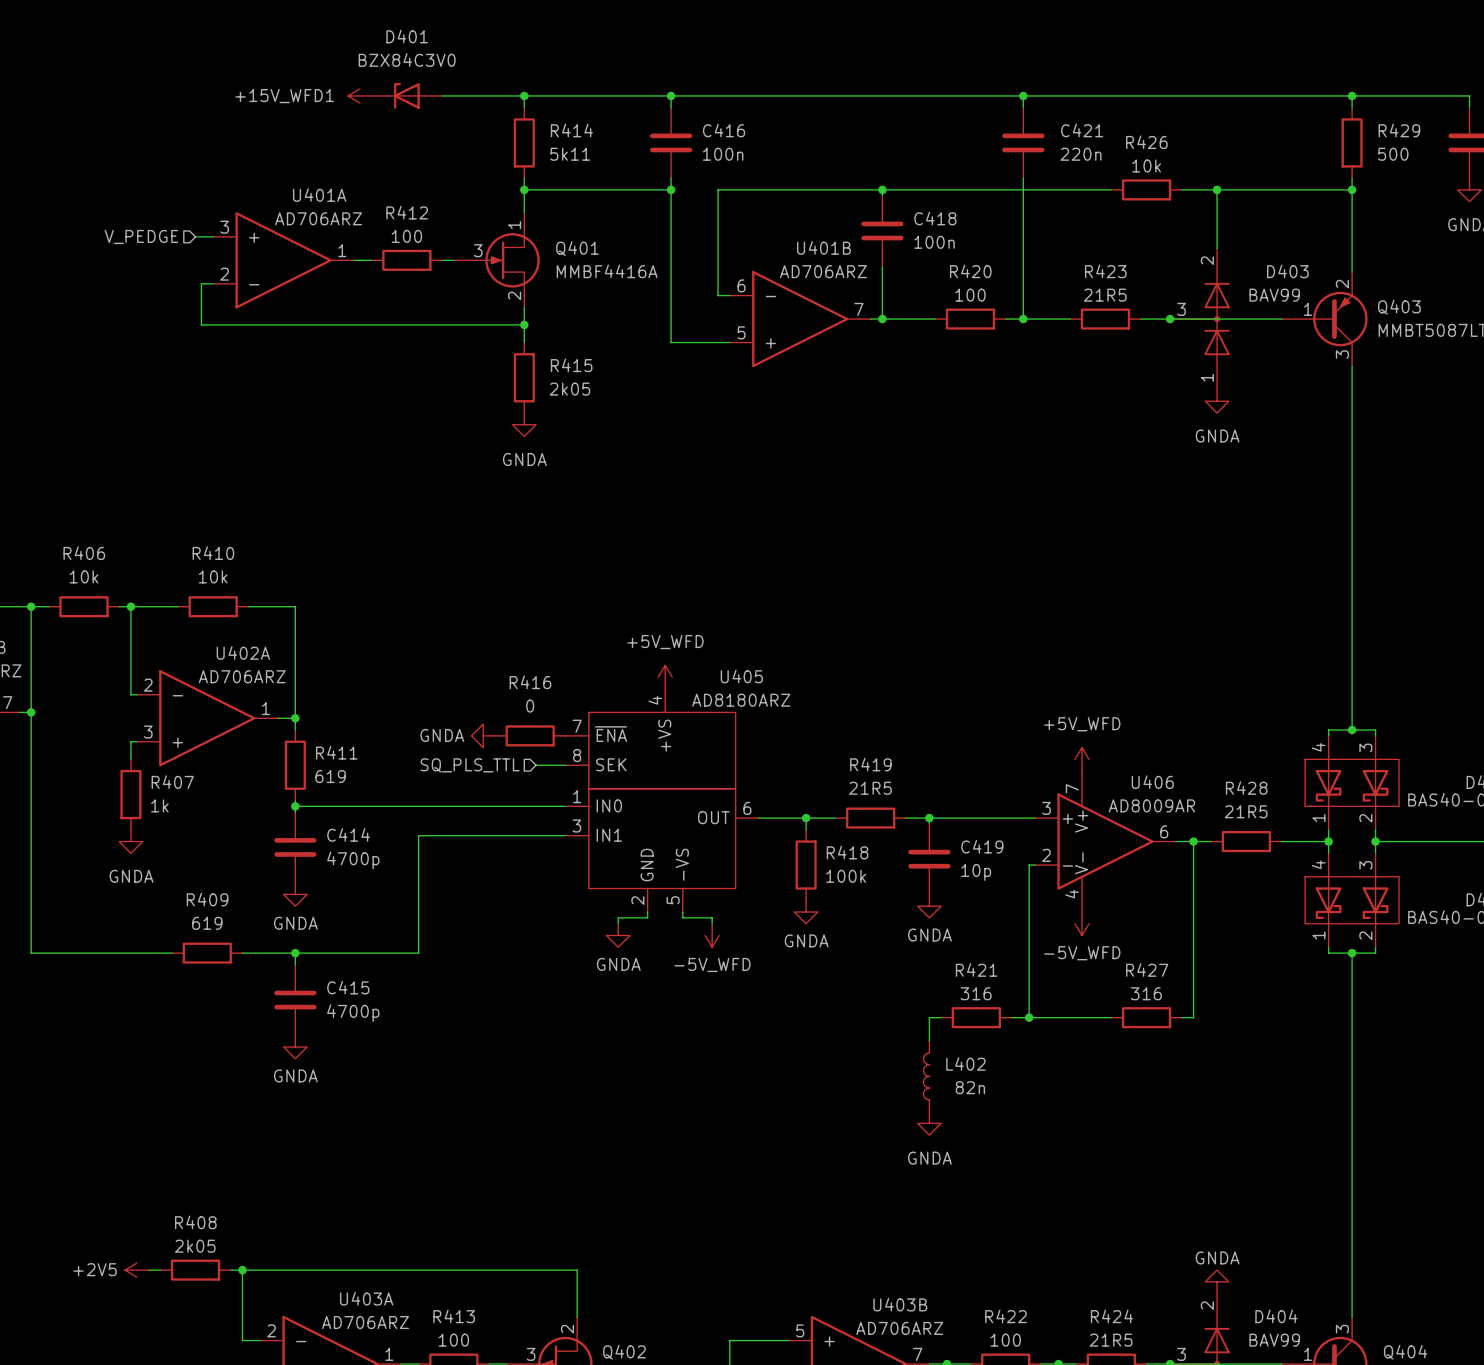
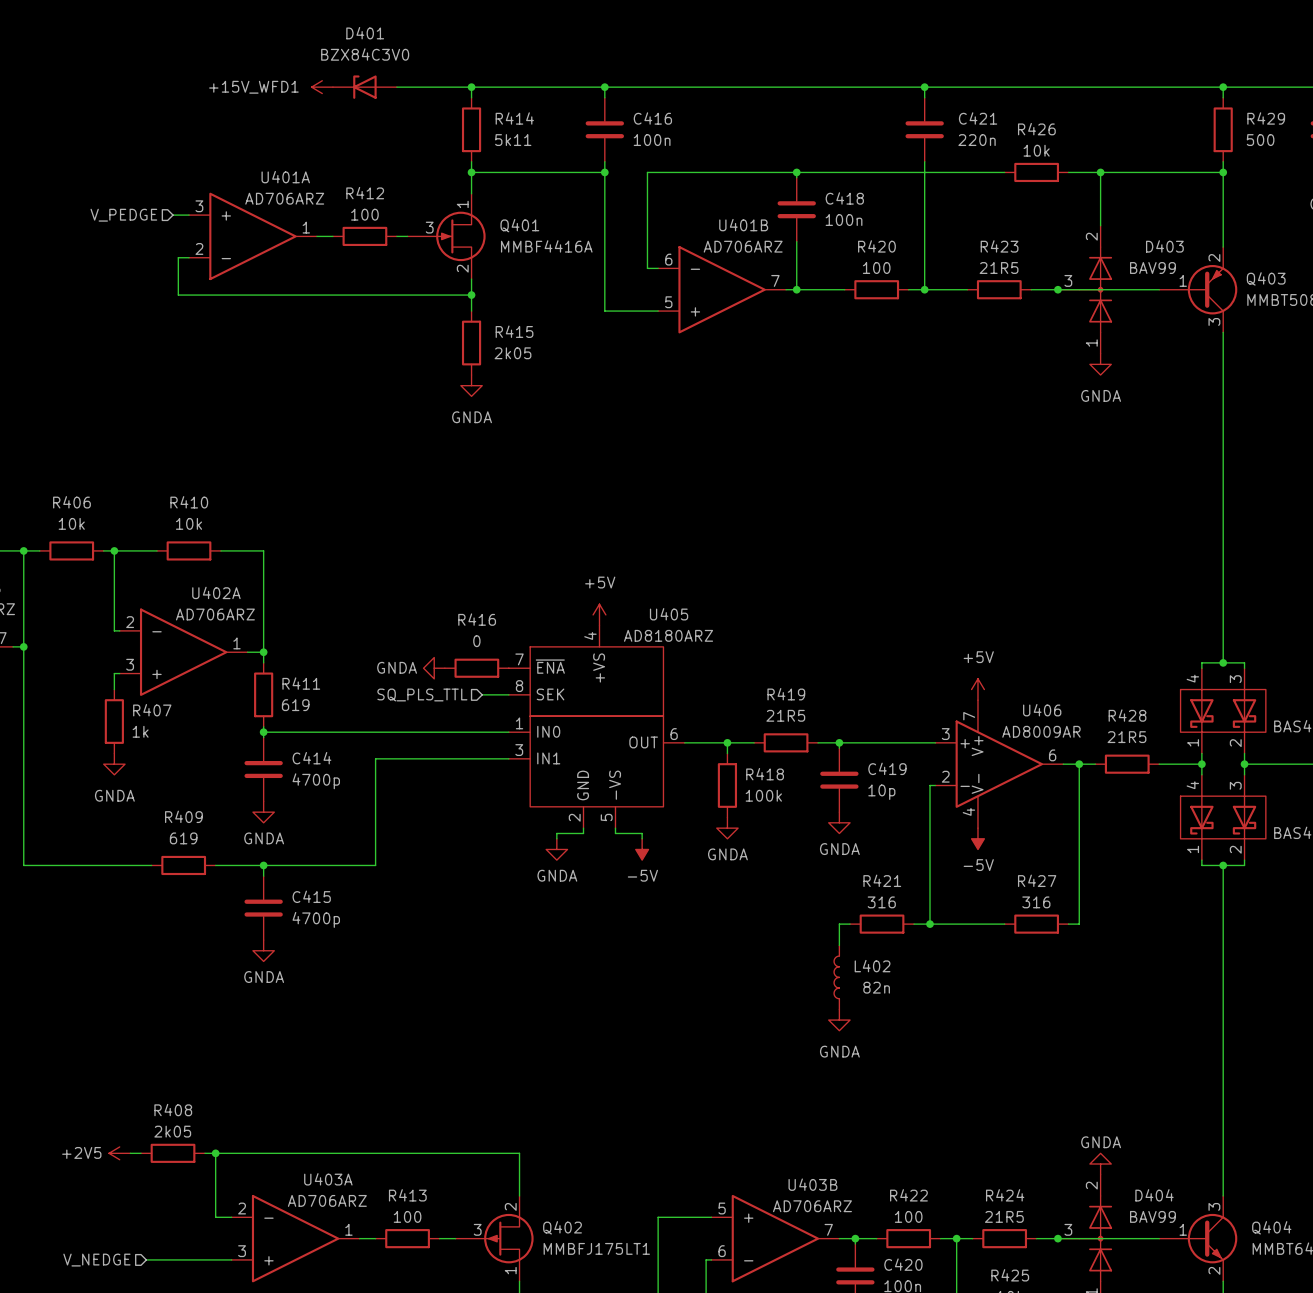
power symbol: +5V_WFD (665, 677) -> +5V (599, 614)
power symbol: +5V_WFD (1082, 759) -> +5V (977, 689)
power symbol: -5V_WFD (1082, 923) -> -5V (977, 838)
power symbol: -5V_WFD (712, 935) -> -5V (642, 849)

